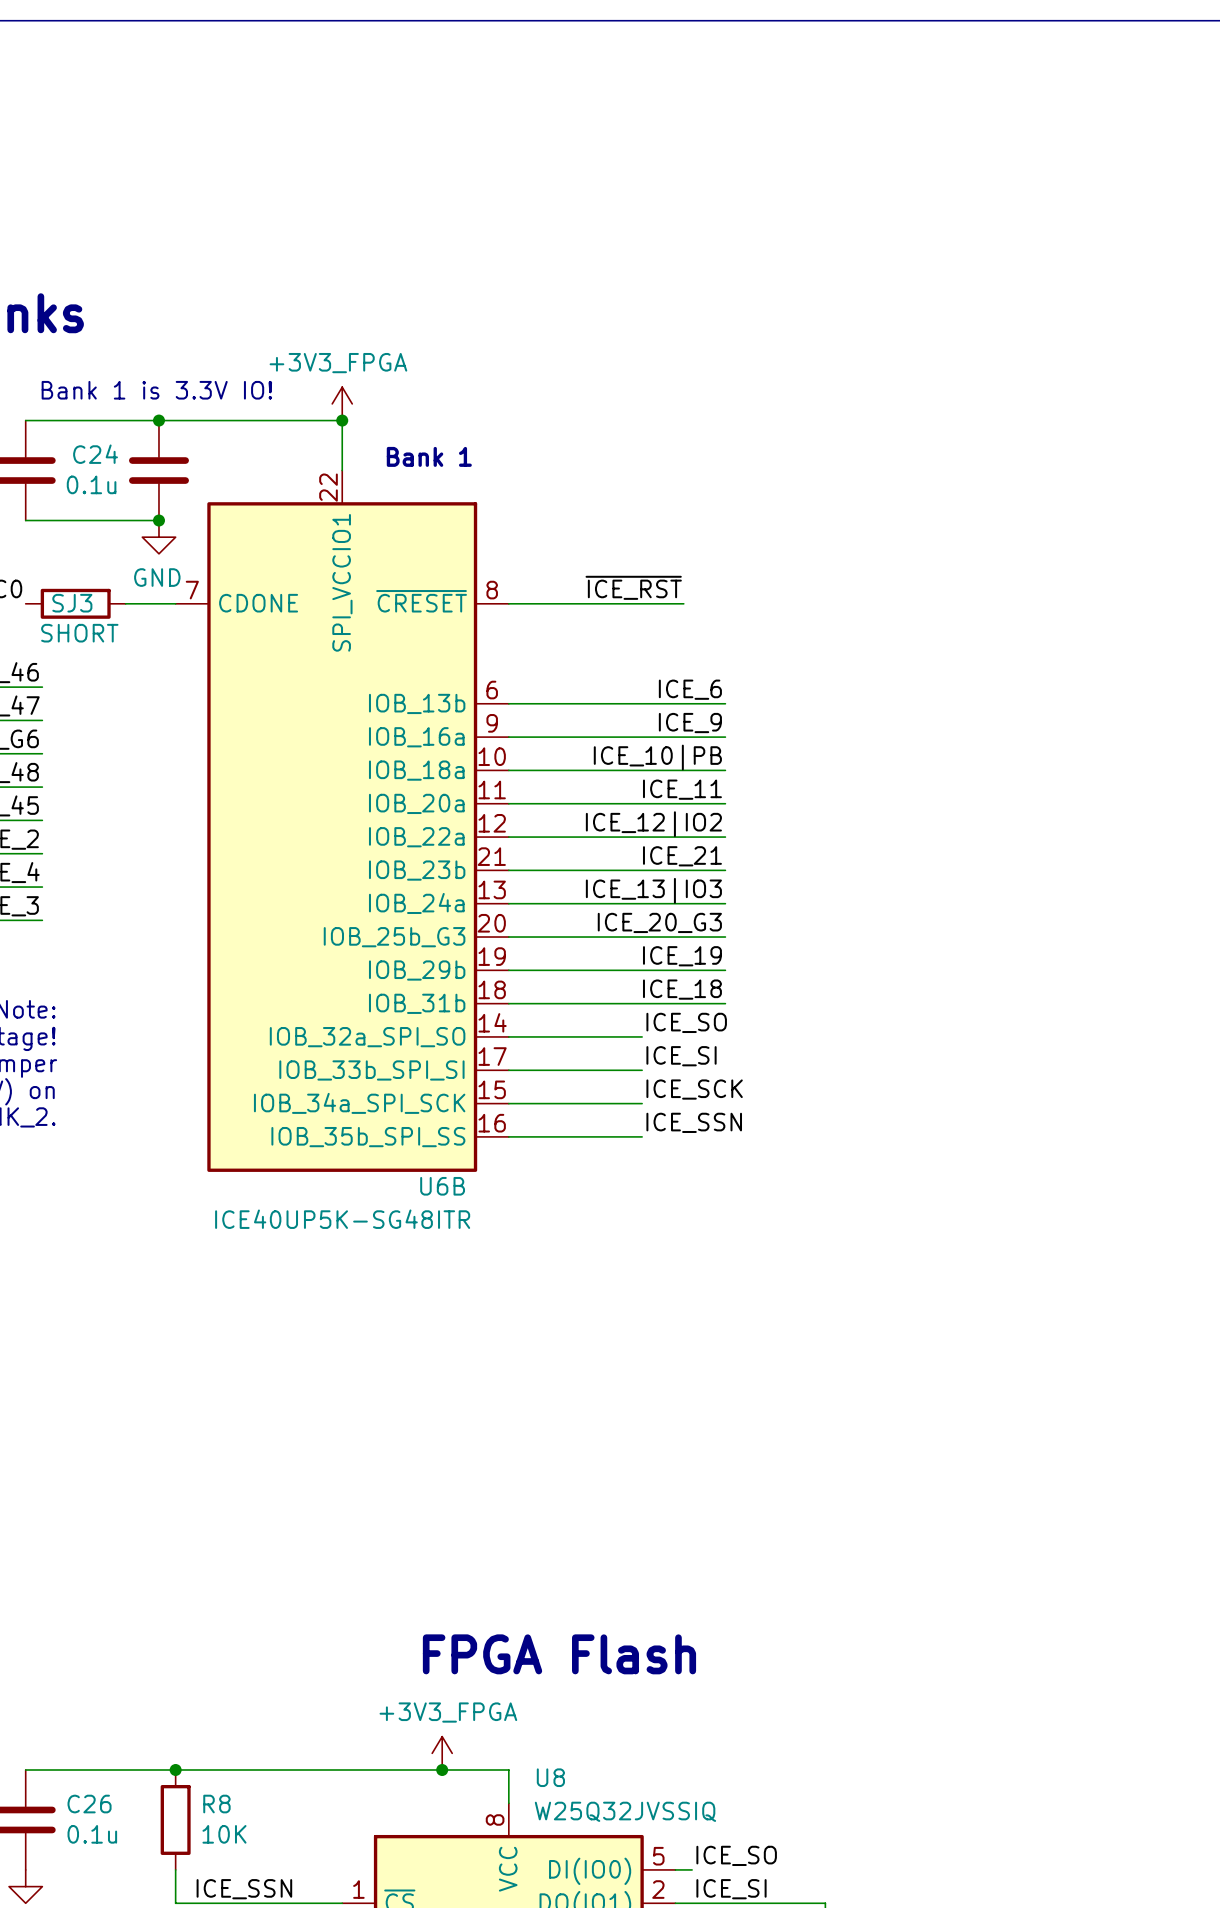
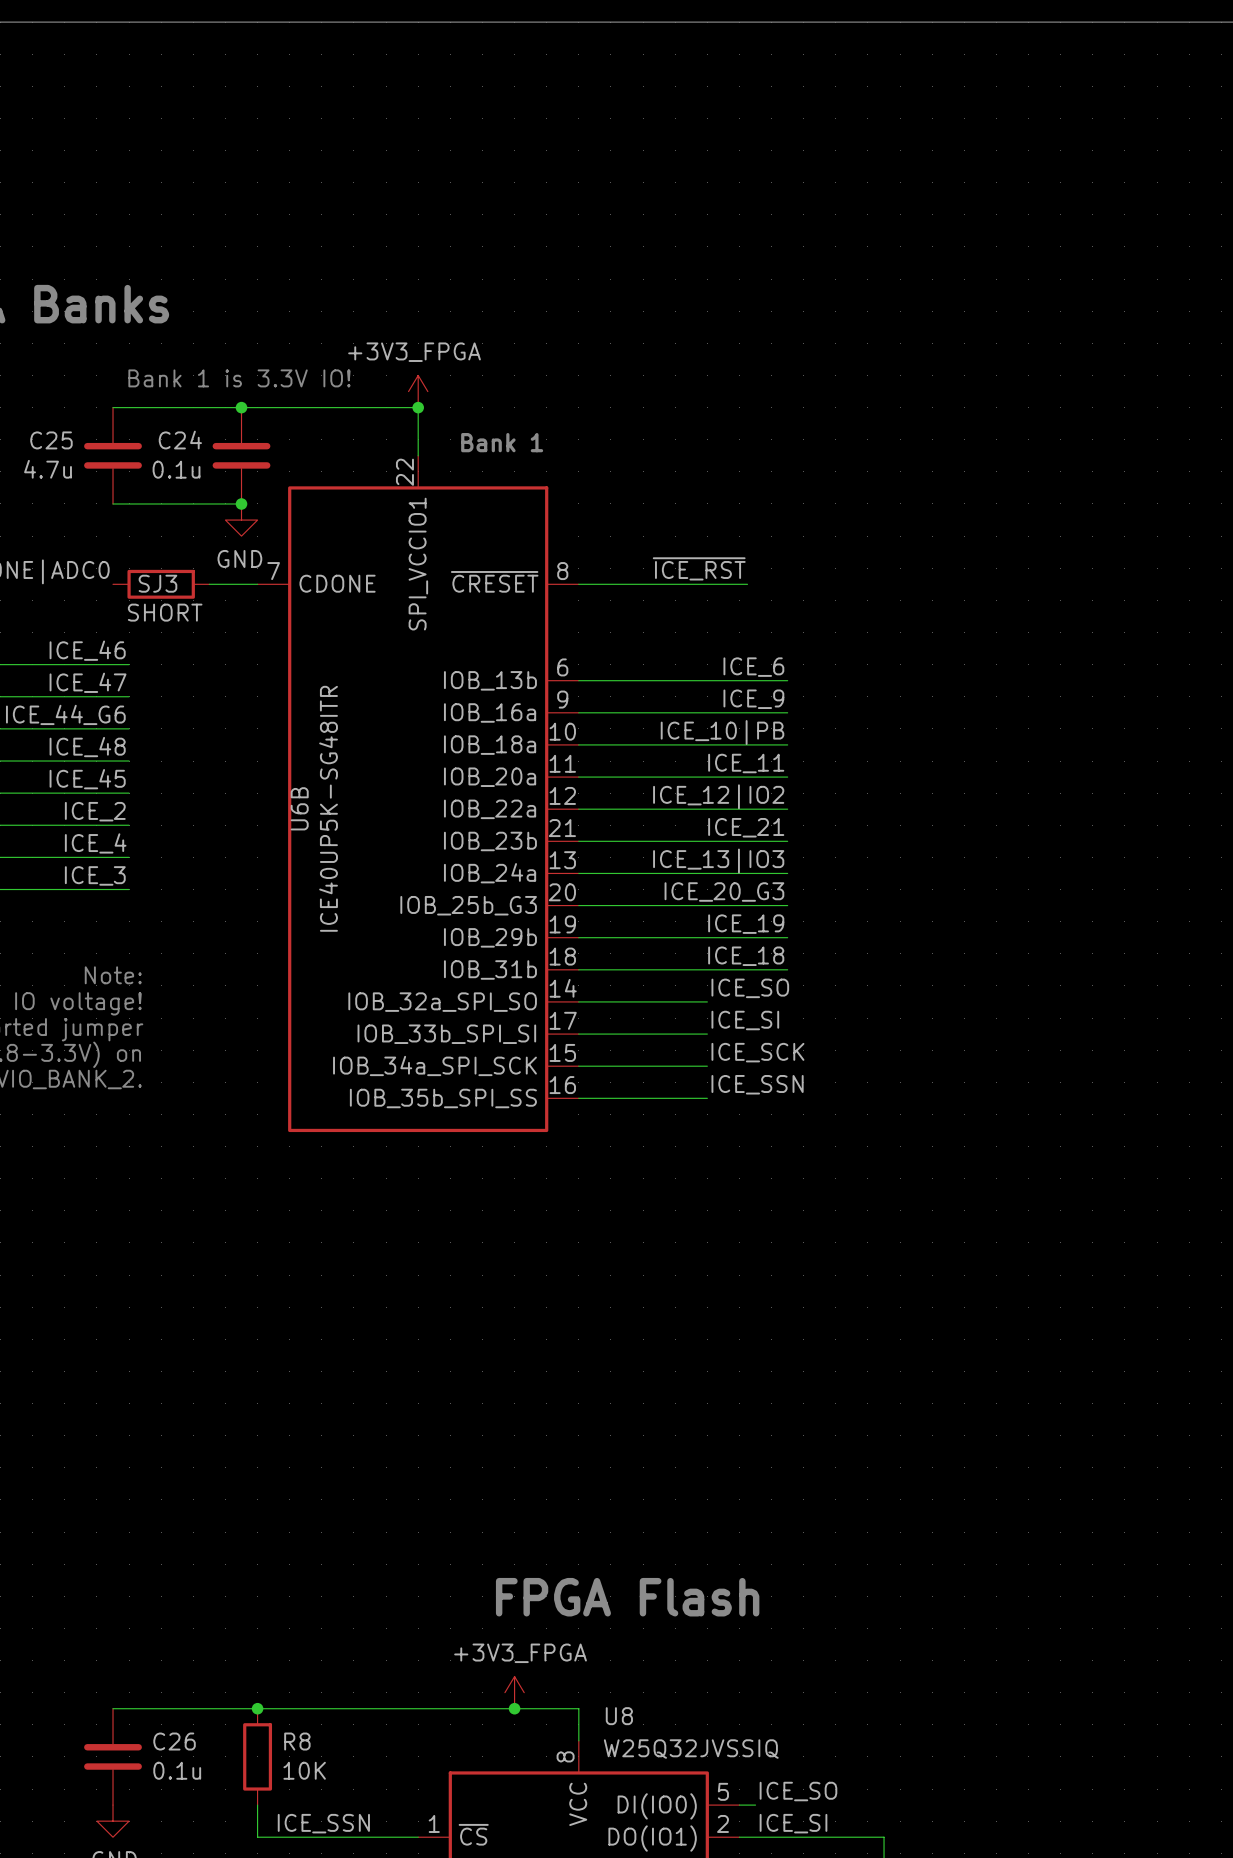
U6B name rotation: 0° (442, 1186) -> 90° counterclockwise (299, 808)
U6B name position: U6B (442, 1186) -> U6B (299, 808)
U6B value rotation: 0° (342, 1219) -> 90° counterclockwise (328, 808)
U6B value position: ICE40UP5K-SG48ITR (342, 1219) -> ICE40UP5K-SG48ITR (328, 808)

